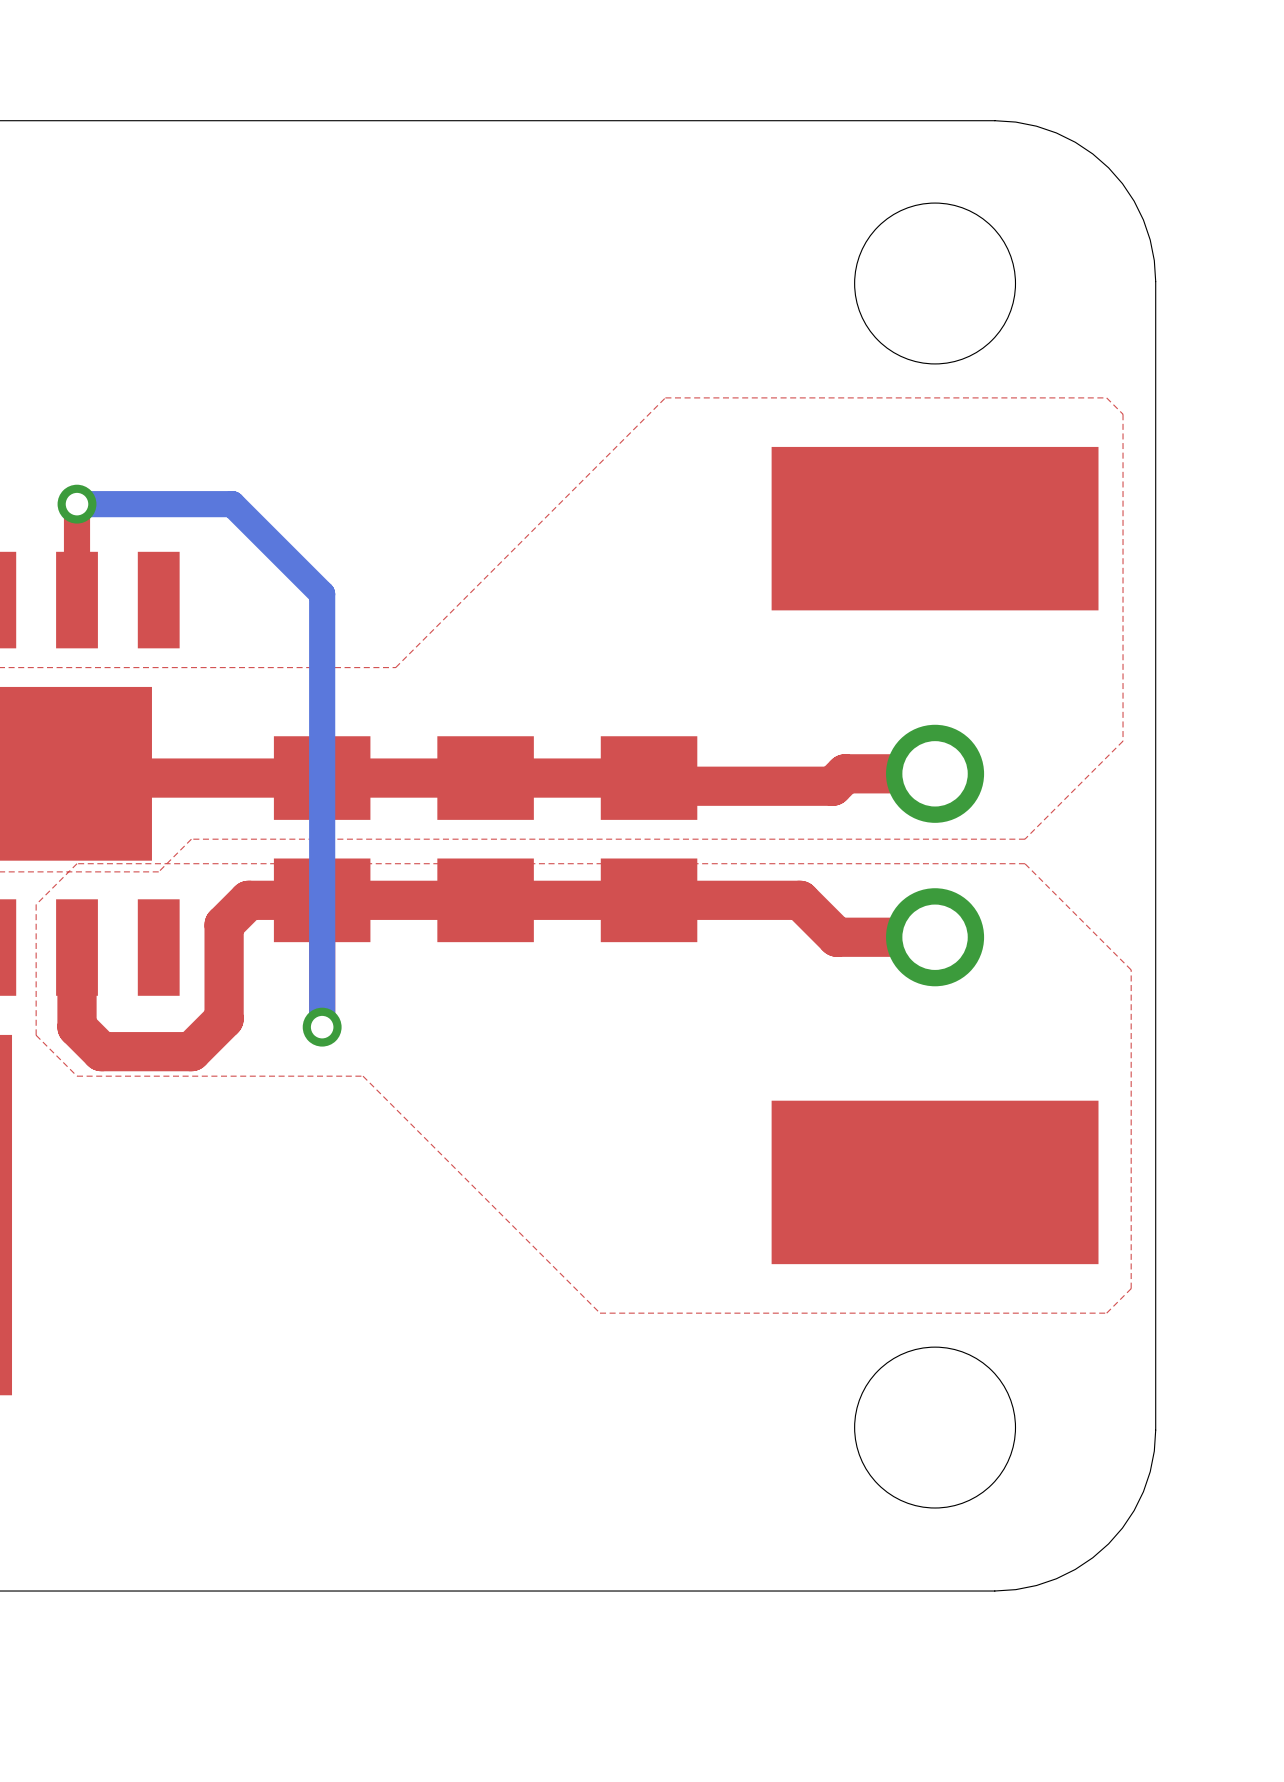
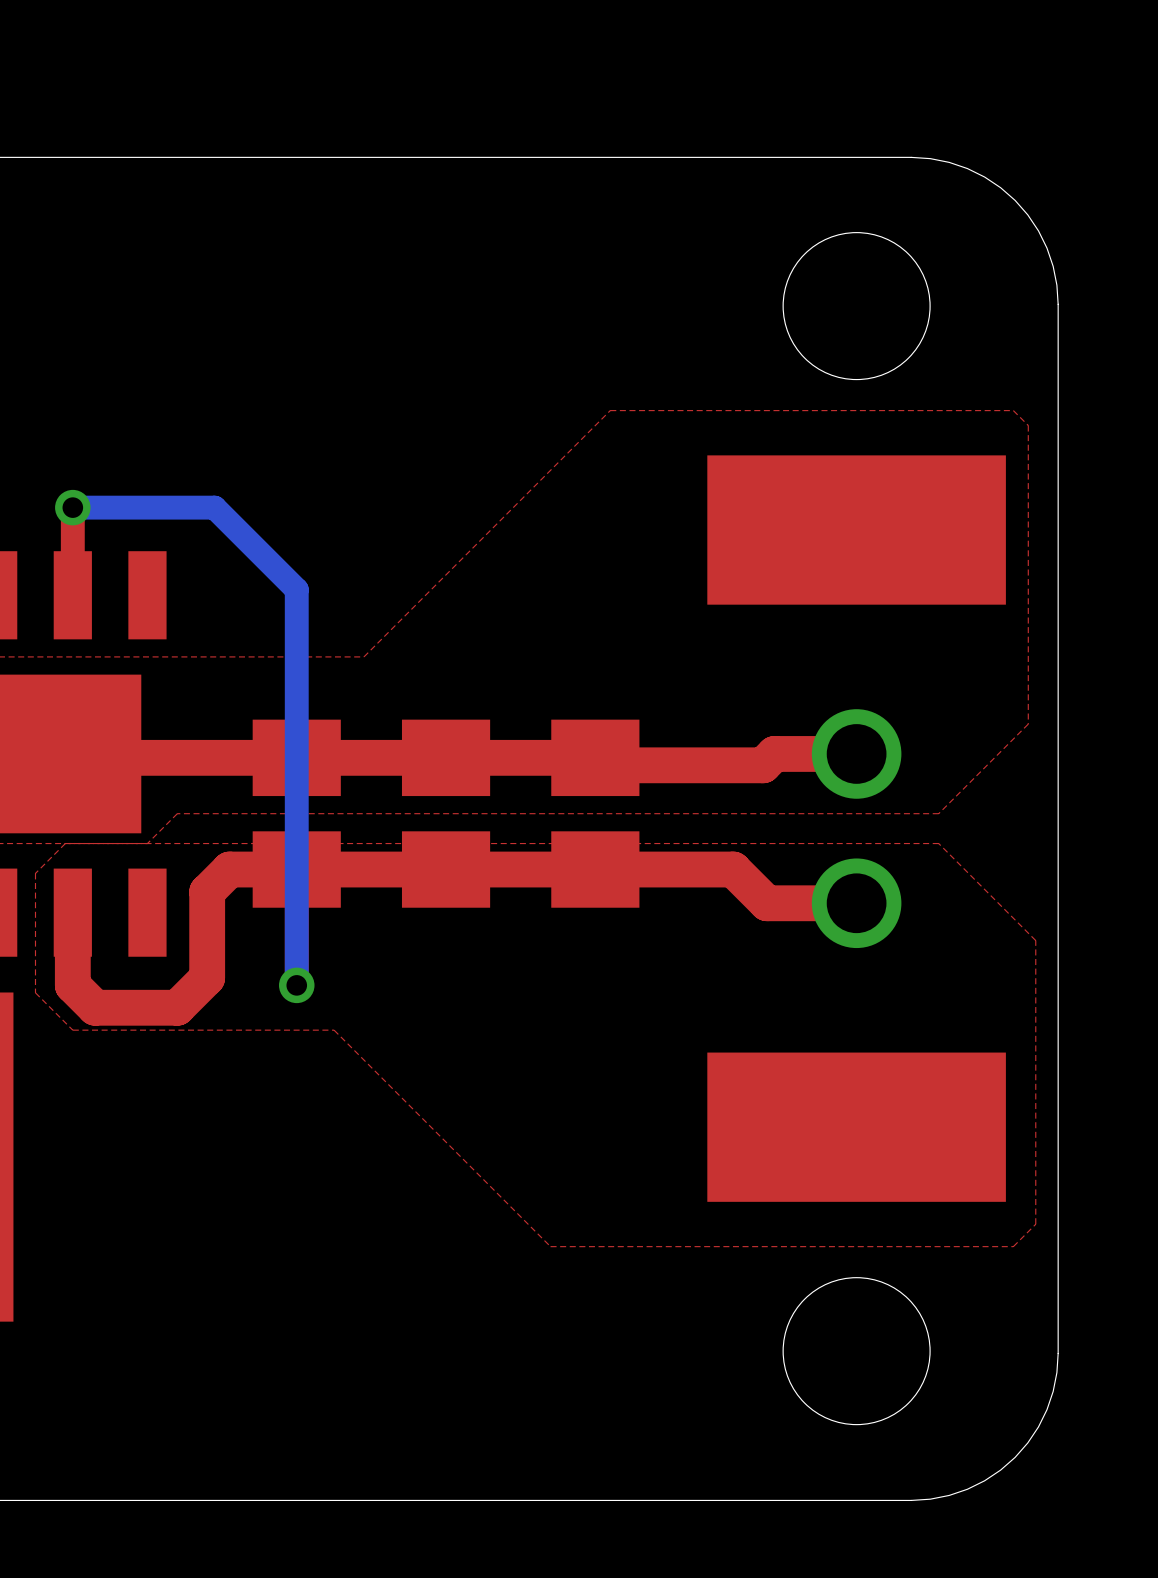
top zone outline: (68, 871) (77, 863) (1024, 863) (1131, 969) (1131, 978) -> (147, 843) (938, 843) (1035, 940)

